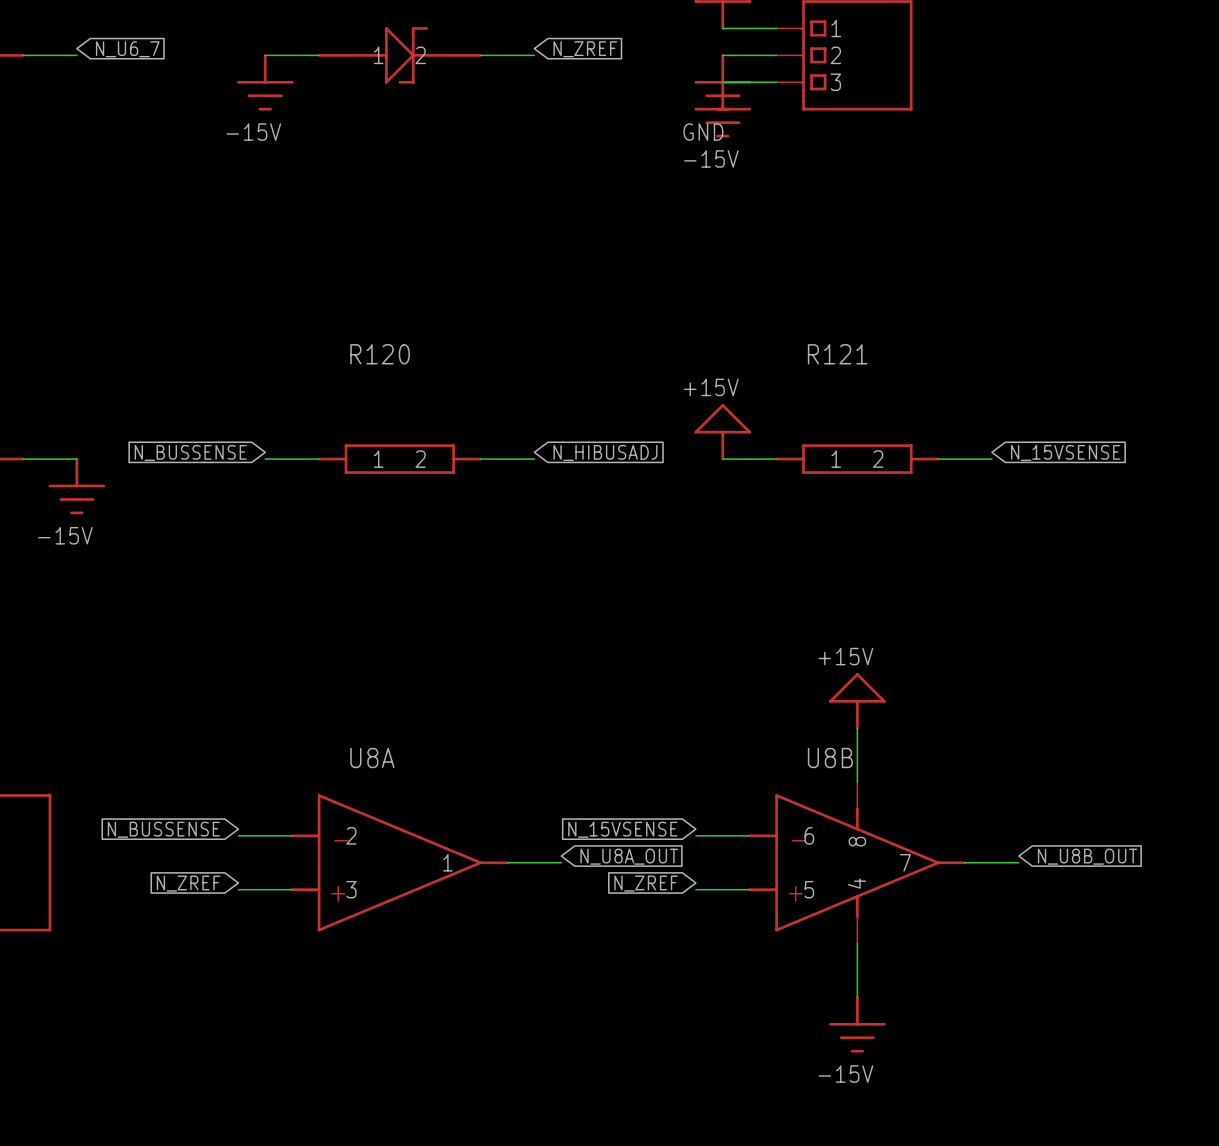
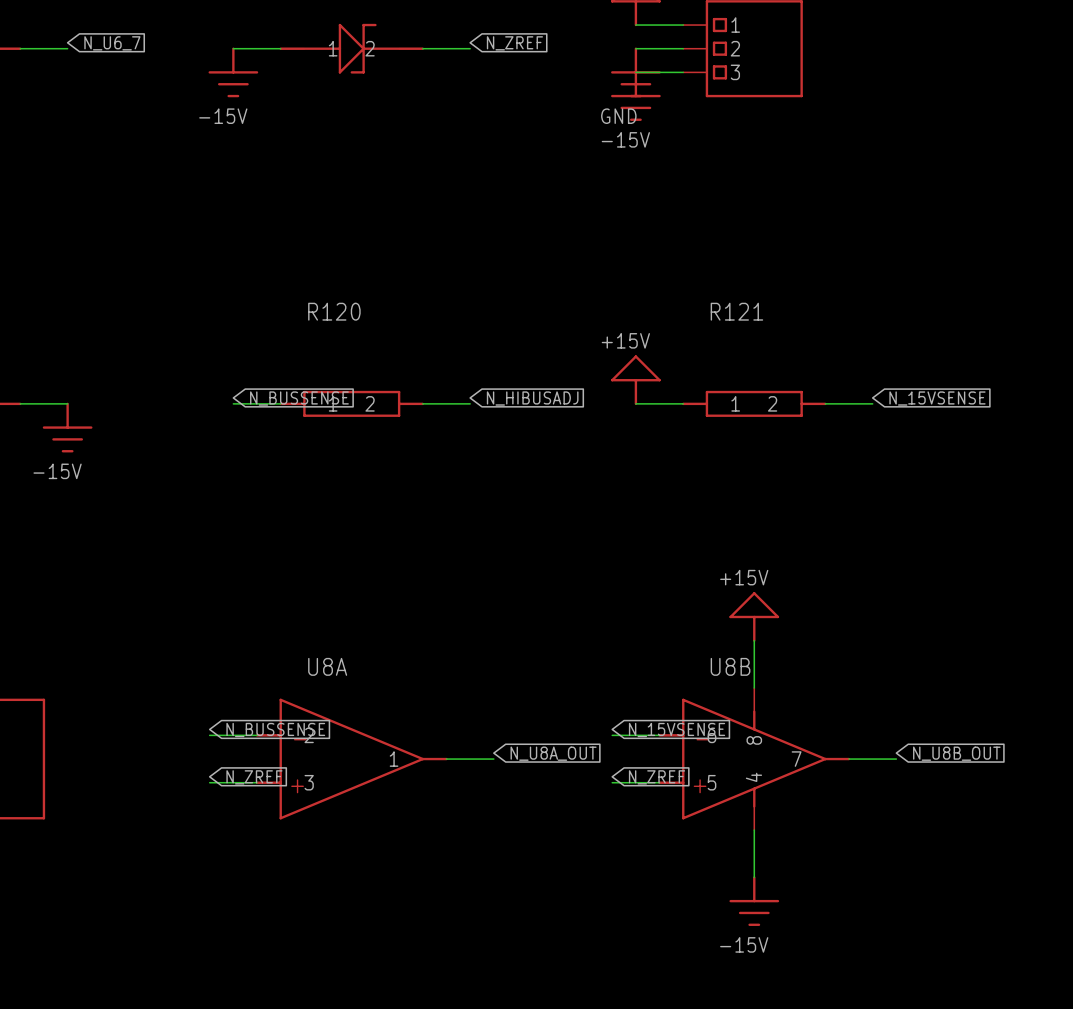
global label rotation: 0° (190, 452) -> 180° (299, 398)
global label rotation: 0° (163, 829) -> 180° (275, 730)
global label rotation: 0° (622, 829) -> 180° (677, 730)
global label position: N_15VSENSE (622, 829) -> N_15VSENSE (677, 730)
global label rotation: 0° (188, 883) -> 180° (254, 777)
global label rotation: 0° (646, 883) -> 180° (656, 777)

